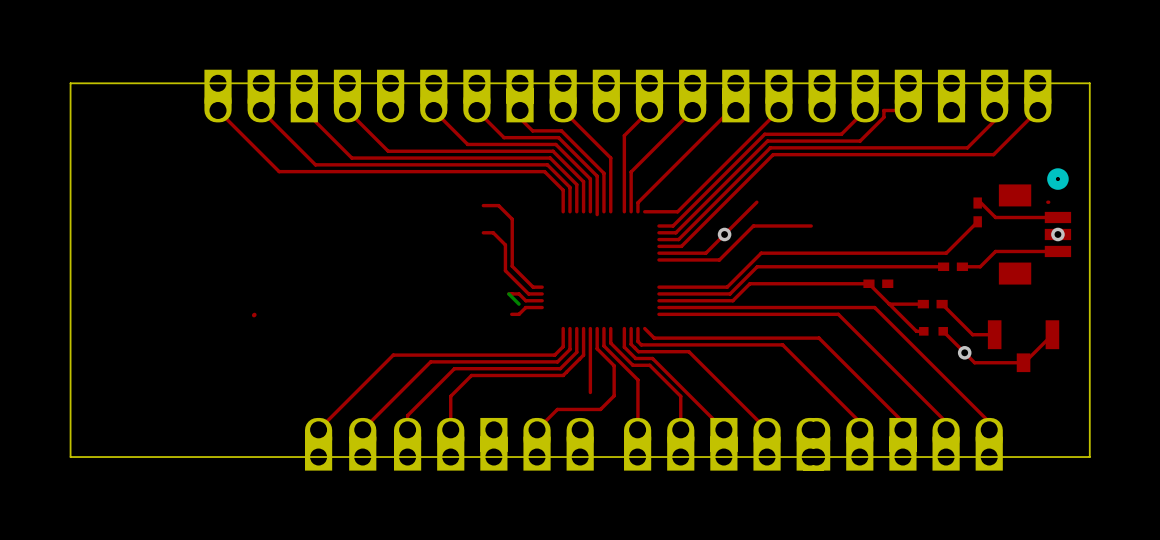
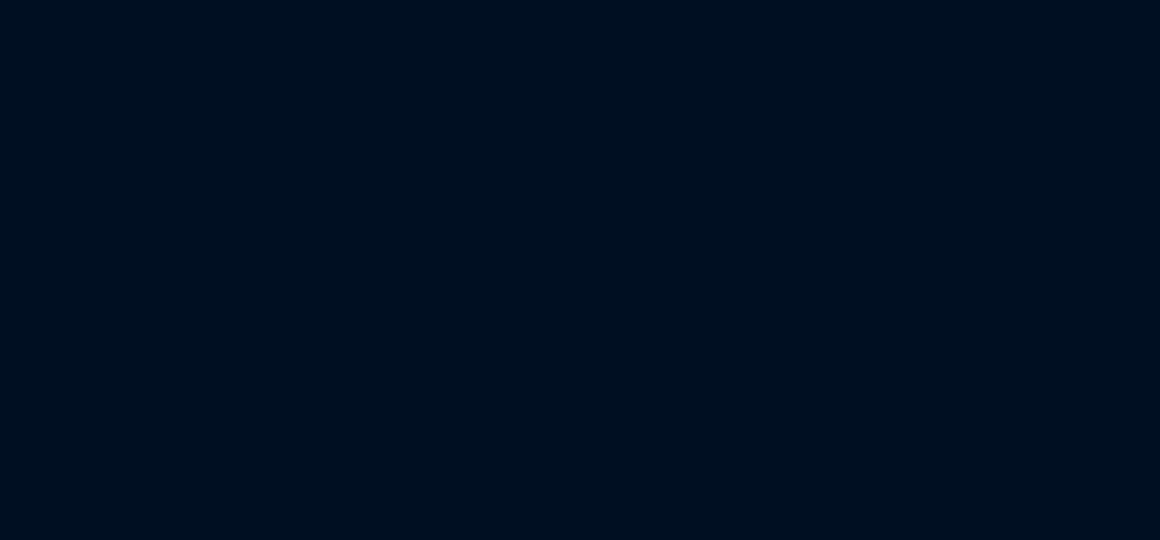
board edge: (1089, 83) (70, 83) (70, 457) (1089, 457) (1089, 83) -> none
part: (627, 96) -> none
top track: (218, 110) (279, 171) (544, 171) (563, 190) (563, 211) -> none
top track: (261, 110) (315, 164) (547, 164) (569, 187) (569, 211) -> none
top track: (304, 110) (351, 158) (550, 158) (576, 184) (576, 211) -> none
top track: (347, 110) (388, 151) (553, 151) (583, 181) (583, 211) -> none
top track: (433, 110) (467, 144) (555, 144) (590, 178) (590, 211) -> none
top track: (476, 110) (504, 137) (558, 137) (597, 176) (597, 214) -> none
top track: (520, 110) (520, 118) (532, 130) (561, 130) (603, 173) (603, 211) -> none
top track: (566, 110) (563, 110) (610, 158) (610, 211) -> none
top track: (649, 110) (624, 135) (624, 211) -> none
top track: (692, 110) (631, 171) (631, 211) -> none
top track: (735, 110) (730, 110) (637, 202) (637, 211) -> none
top track: (778, 110) (677, 211) (644, 211) -> none
top track: (865, 110) (841, 134) (764, 134) (673, 226) (658, 226) -> none
top track: (908, 110) (883, 110) (883, 117) (860, 141) (767, 141) (675, 232) (658, 232) -> none
top track: (994, 110) (994, 120) (967, 147) (770, 147) (678, 239) (658, 239) -> none
top track: (1037, 110) (993, 154) (773, 154) (681, 246) (658, 246) -> none
top track: (756, 202) (705, 253) (658, 253) -> none
top track: (980, 202) (995, 217) (1057, 217) -> none
top track: (1048, 202) (1047, 202) -> none
top track: (483, 205) (498, 205) (512, 219) (512, 266) (533, 287) (542, 287) -> none
part: (977, 212) -> none
top track: (977, 221) (946, 253) (761, 253) (727, 287) (658, 287) -> none
top track: (811, 226) (753, 226) (719, 259) (658, 259) -> none
part: (1034, 226) -> none
top track: (483, 232) (493, 232) (505, 244) (505, 270) (528, 293) (542, 293) -> none
via: (724, 234) -> none
via: (1057, 234) -> none
top track: (1057, 251) (995, 251) (980, 266) (962, 266) -> none
top track: (943, 266) (757, 266) (730, 293) (658, 293) -> none
part: (953, 266) -> none
part: (878, 283) -> none
top track: (508, 293) (519, 293) (525, 300) (542, 300) -> none
bottom track: (508, 293) (519, 304) -> none
top track: (658, 300) (732, 300) (749, 283) (868, 283) (916, 331) (923, 331) -> none
top track: (889, 304) (923, 304) -> none
part: (932, 304) -> none
top track: (942, 304) (972, 334) (994, 334) -> none
top track: (542, 307) (525, 307) (519, 314) (511, 314) -> none
top track: (658, 307) (874, 307) (997, 429) -> none
top track: (254, 314) (254, 315) -> none
top track: (658, 314) (838, 314) (953, 429) -> none
top track: (563, 328) (563, 346) (554, 355) (393, 355) (318, 429) -> none
top track: (569, 328) (569, 349) (557, 361) (430, 361) (362, 429) -> none
top track: (576, 328) (576, 352) (560, 368) (454, 368) (407, 415) (407, 429) -> none
top track: (583, 328) (583, 355) (563, 375) (471, 375) (450, 396) (450, 429) -> none
top track: (590, 328) (590, 392) -> none
top track: (597, 328) (597, 348) (614, 365) (614, 395) (600, 409) (557, 409) (537, 429) -> none
top track: (603, 328) (603, 345) (637, 379) (637, 429) -> none
top track: (610, 328) (610, 343) (632, 365) (649, 365) (680, 396) (680, 429) -> none
top track: (624, 328) (624, 347) (635, 358) (652, 358) (723, 429) -> none
top track: (631, 328) (631, 344) (638, 351) (688, 351) (767, 429) -> none
top track: (637, 328) (637, 341) (641, 344) (782, 344) (867, 429) -> none
top track: (644, 328) (654, 338) (819, 338) (910, 429) -> none
part: (933, 331) -> none
top track: (943, 331) (974, 362) (1024, 362) (1052, 334) -> none
part: (1023, 346) -> none
via: (964, 352) -> none
part: (318, 444) -> none
part: (362, 444) -> none
part: (493, 444) -> none
part: (723, 444) -> none
part: (902, 444) -> none

